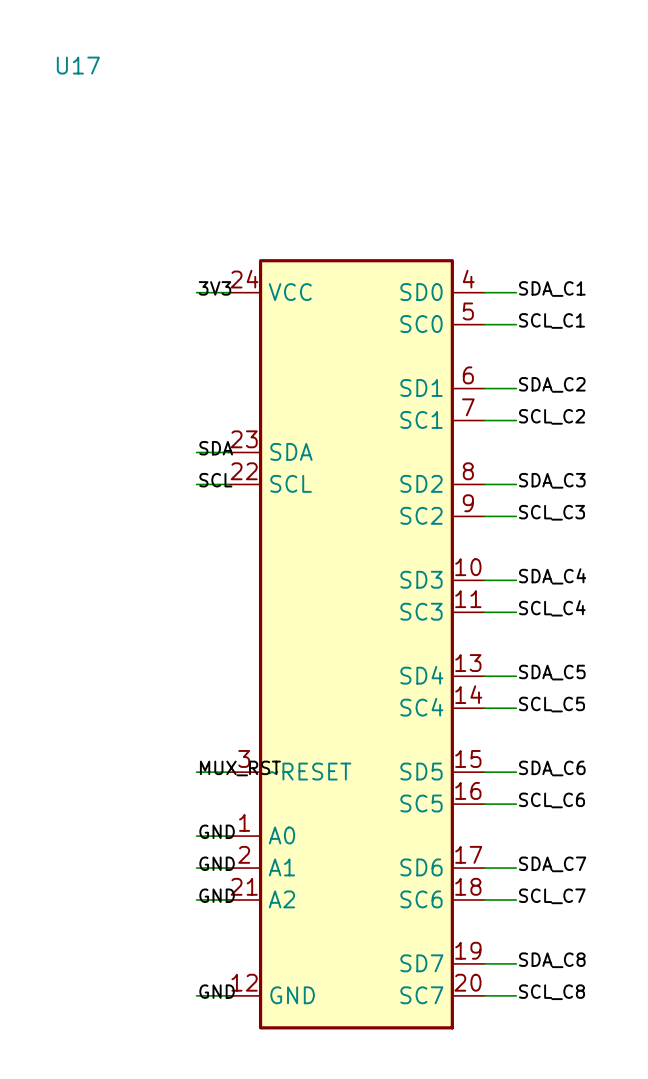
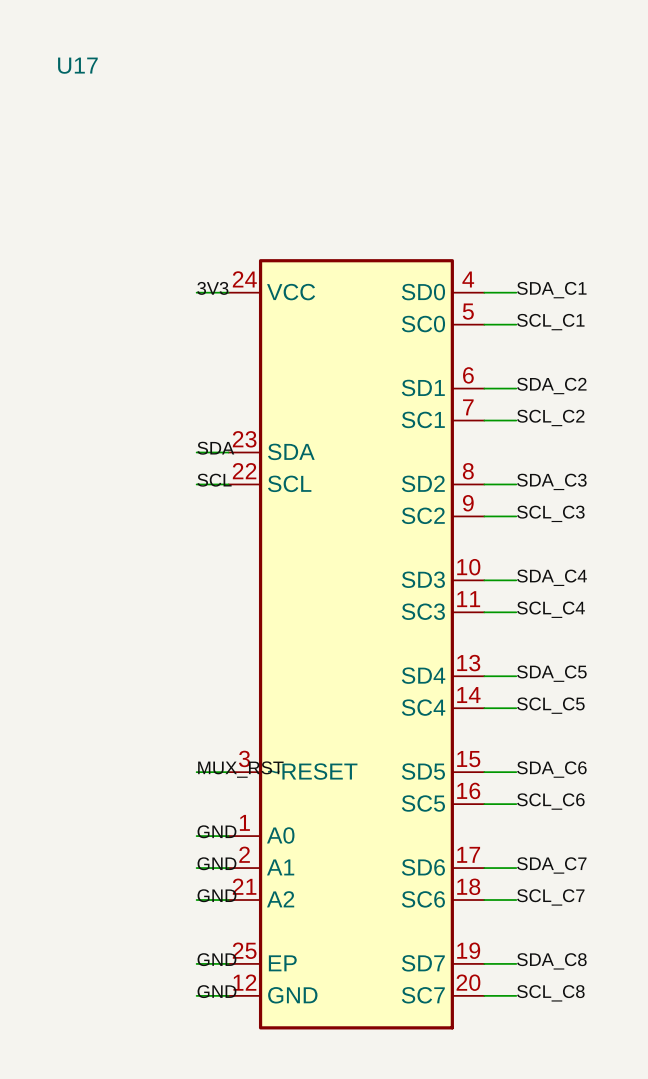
U17 symbol: [228, 259, 485, 1030] -> [228, 259, 485, 1030]
label: none -> GND (216, 959)
wire: none -> (196, 963) (228, 963)

